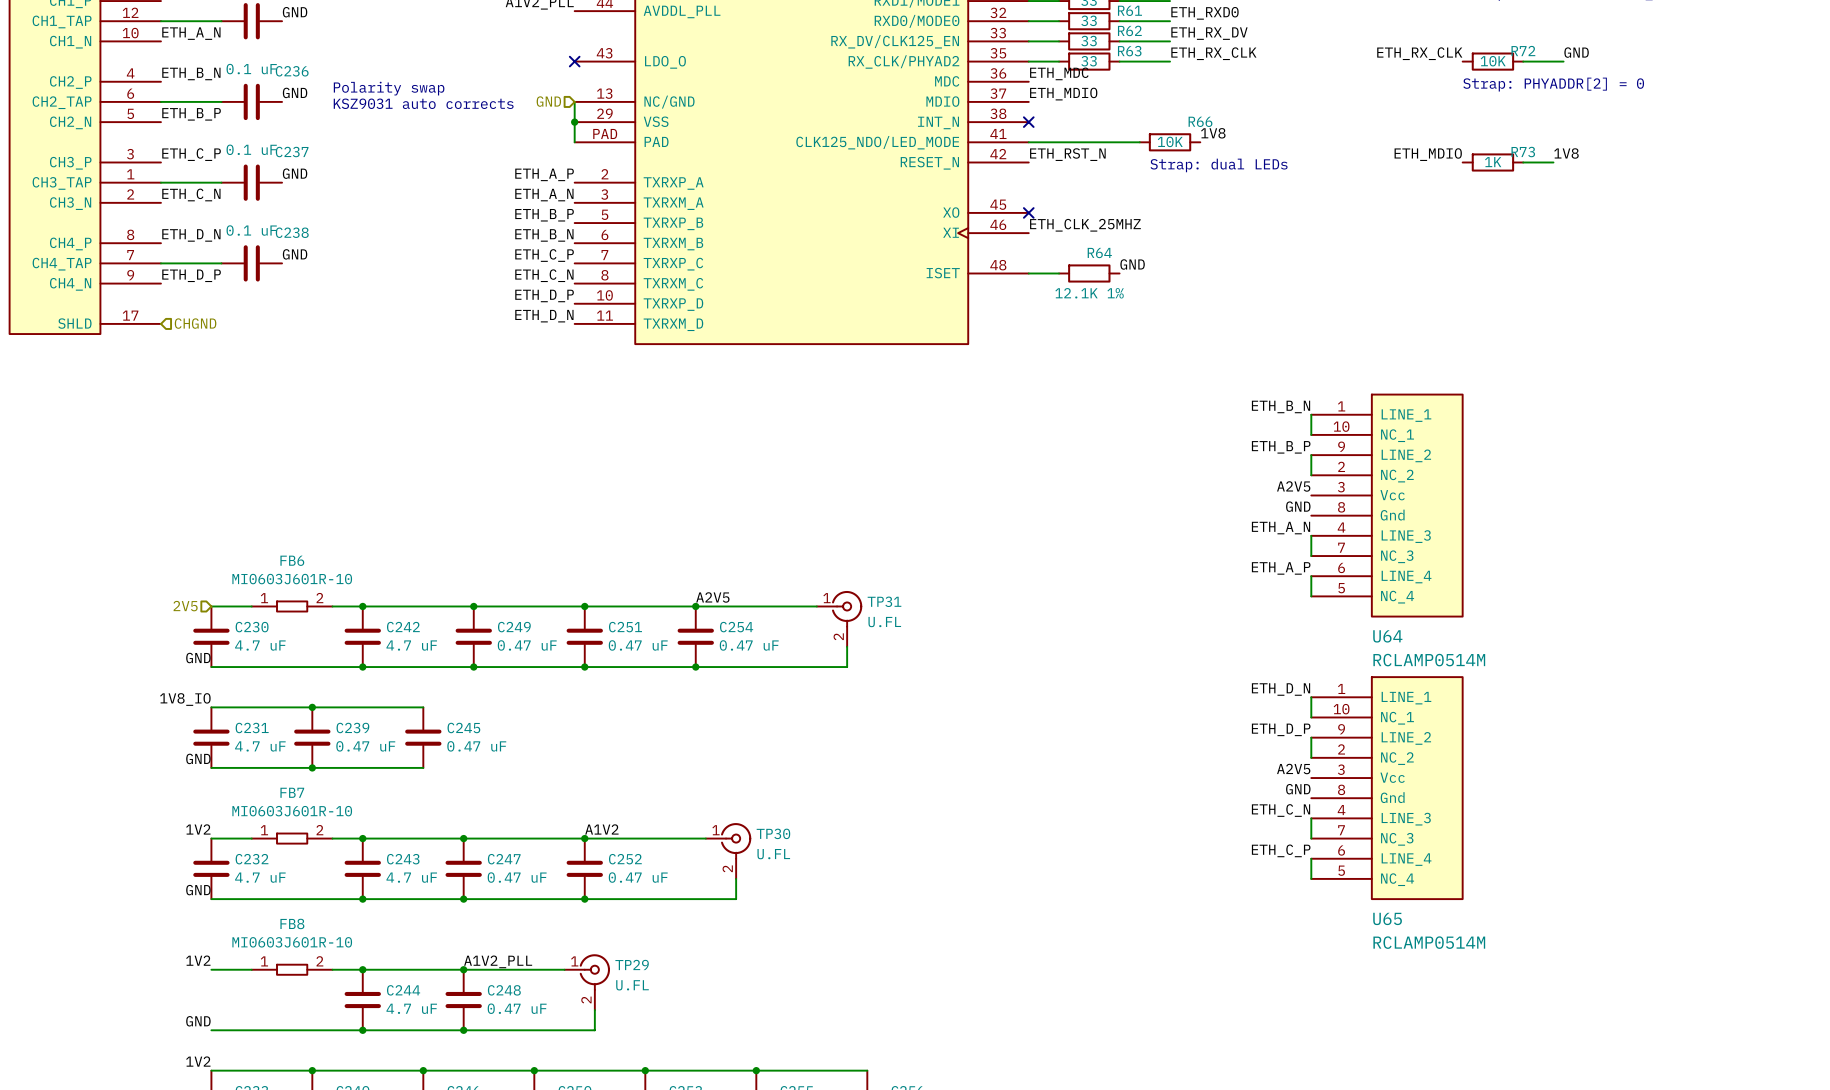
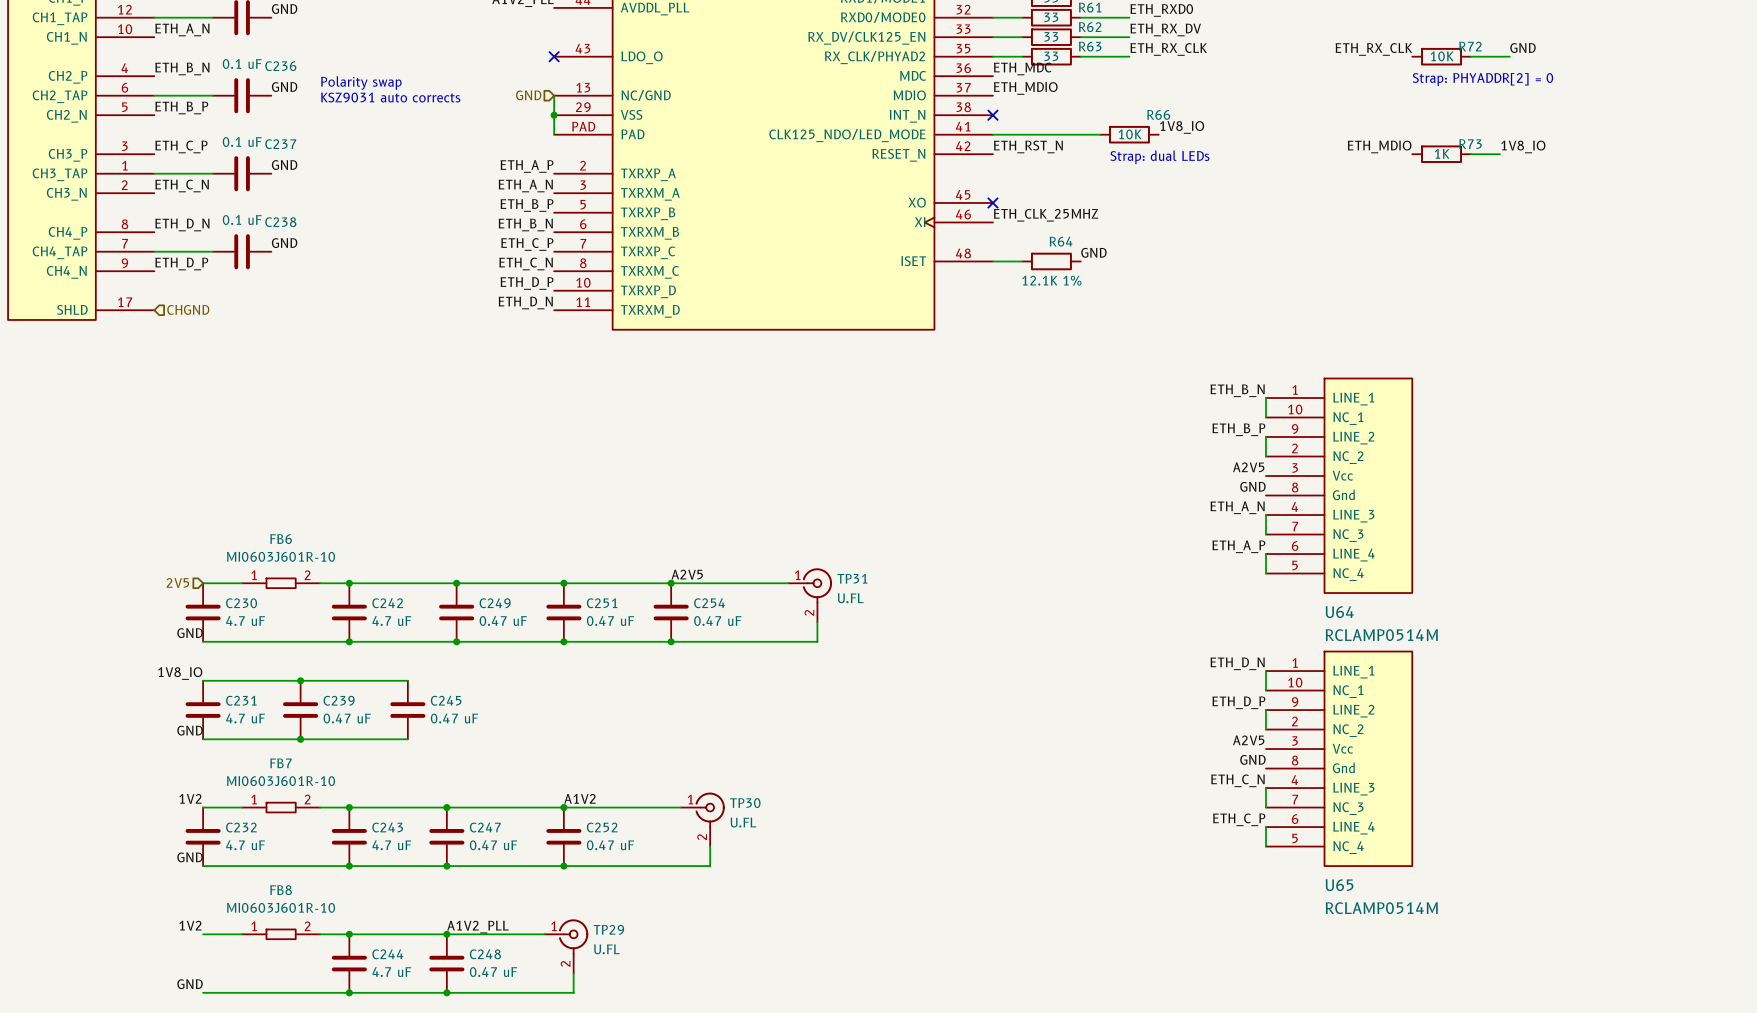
label: 1V8 (1213, 133) -> 1V8_IO (1182, 127)
label: 1V8 (1566, 153) -> 1V8_IO (1523, 146)

